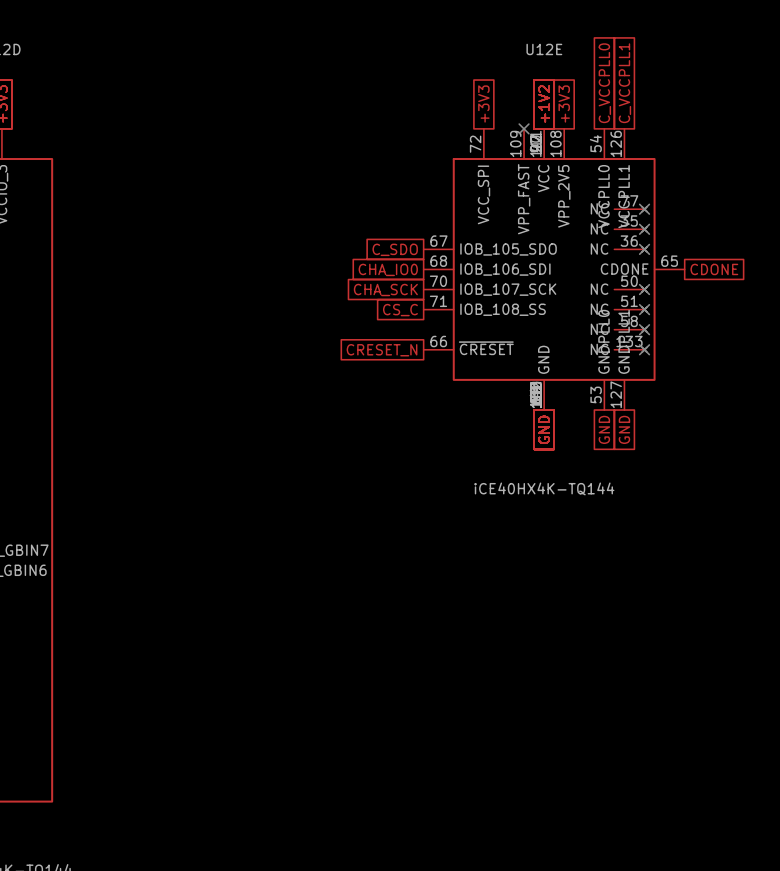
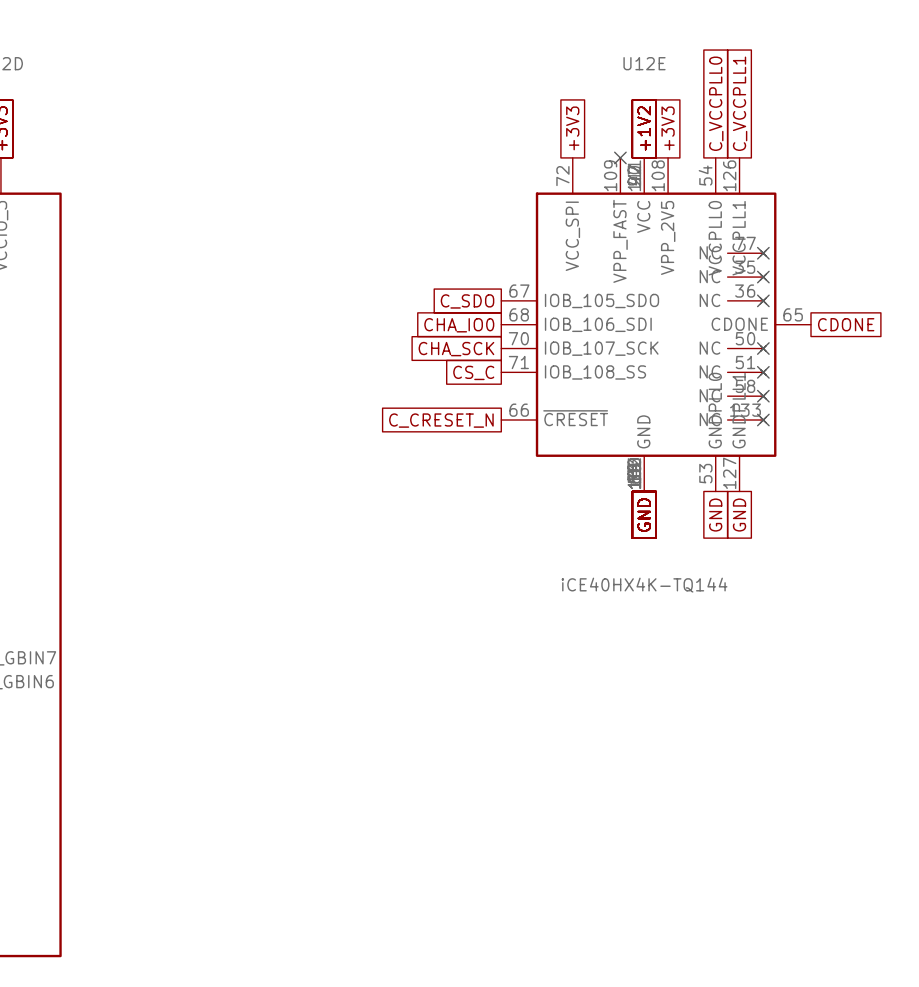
global label: CRESET_N (382, 350) -> C_CRESET_N (441, 420)

